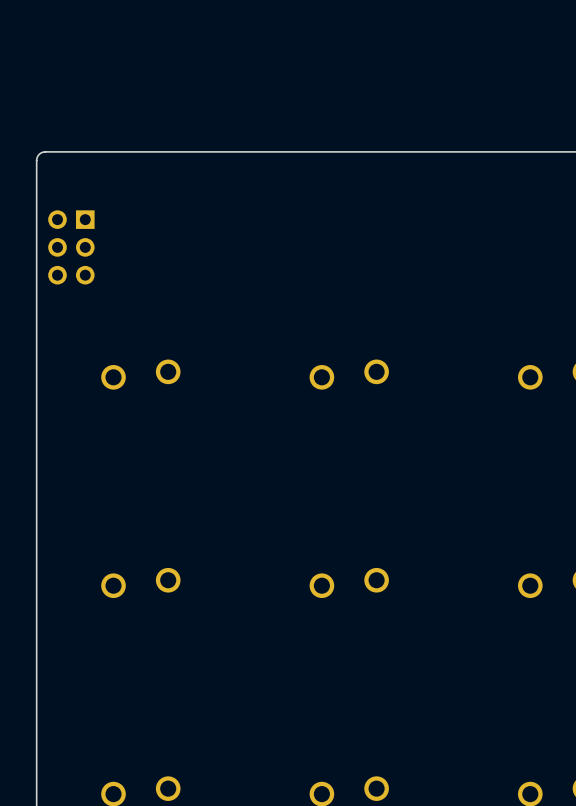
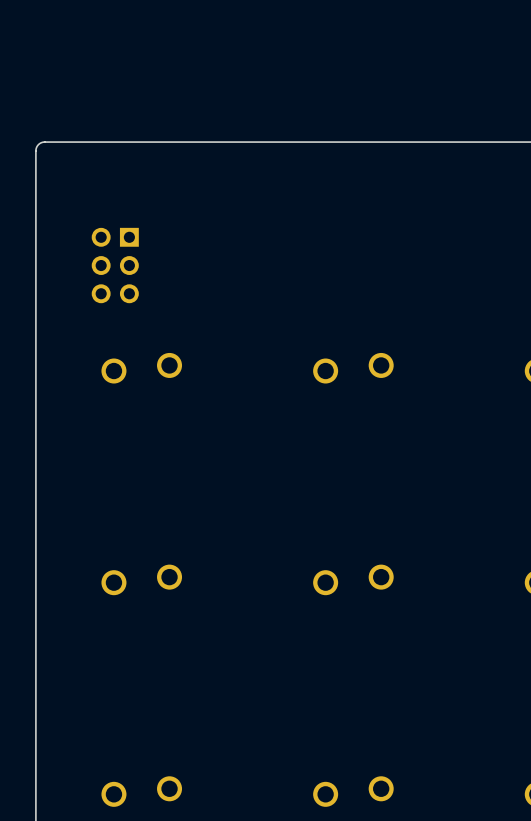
part position: (71, 247) -> (115, 265)

